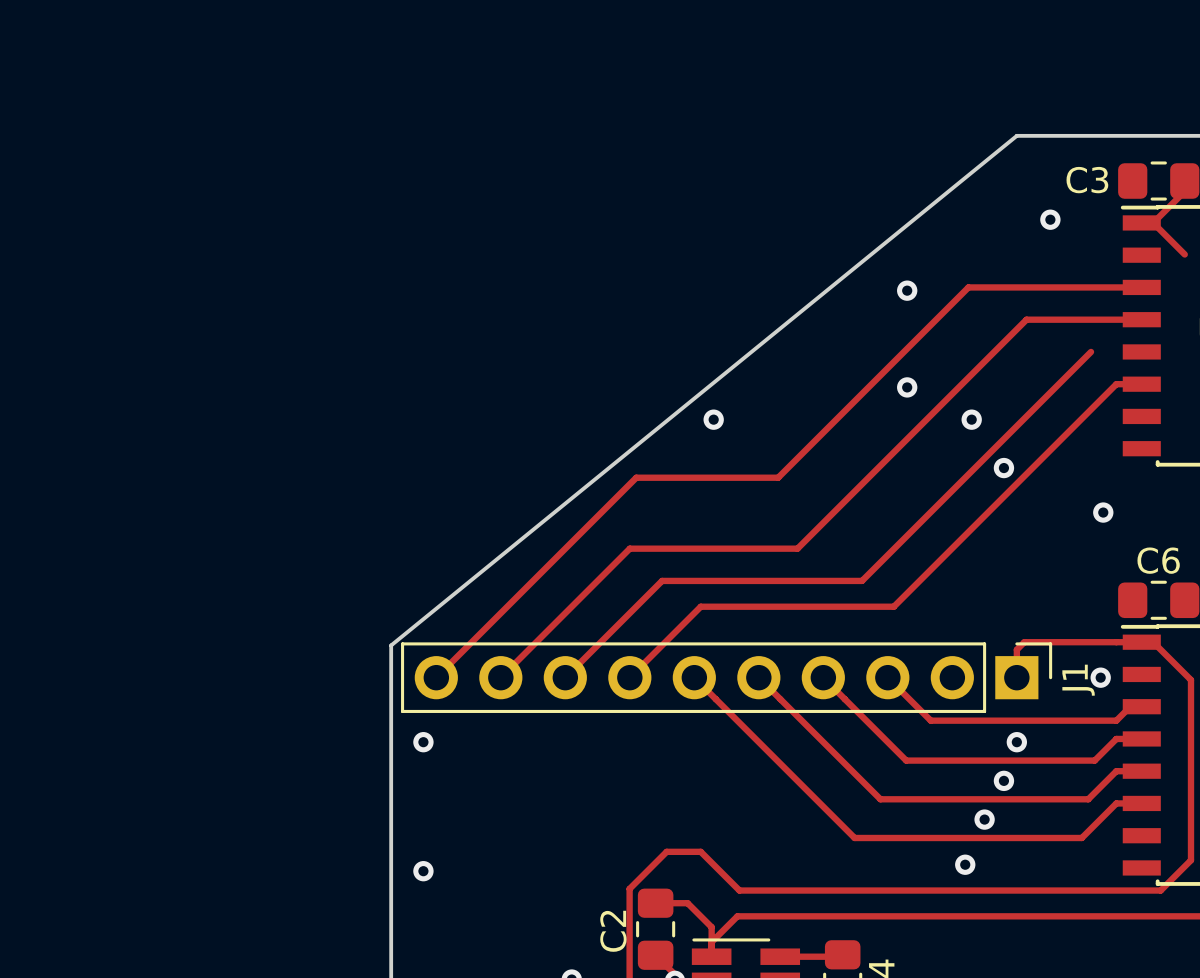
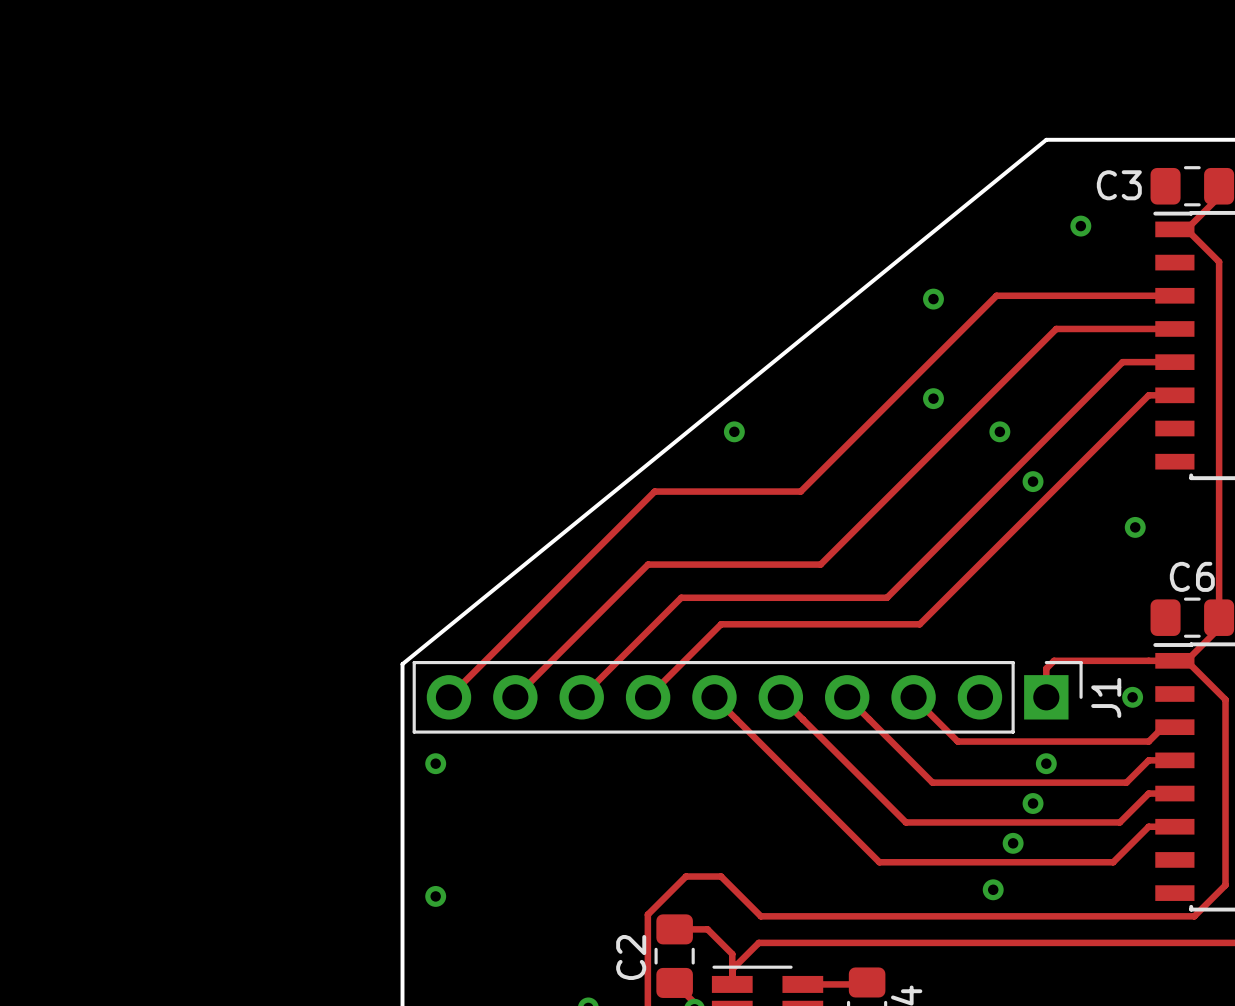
track: none -> (1219, 261) (1219, 628) (1186, 660)
track: none -> (1122, 362) (1174, 362)

